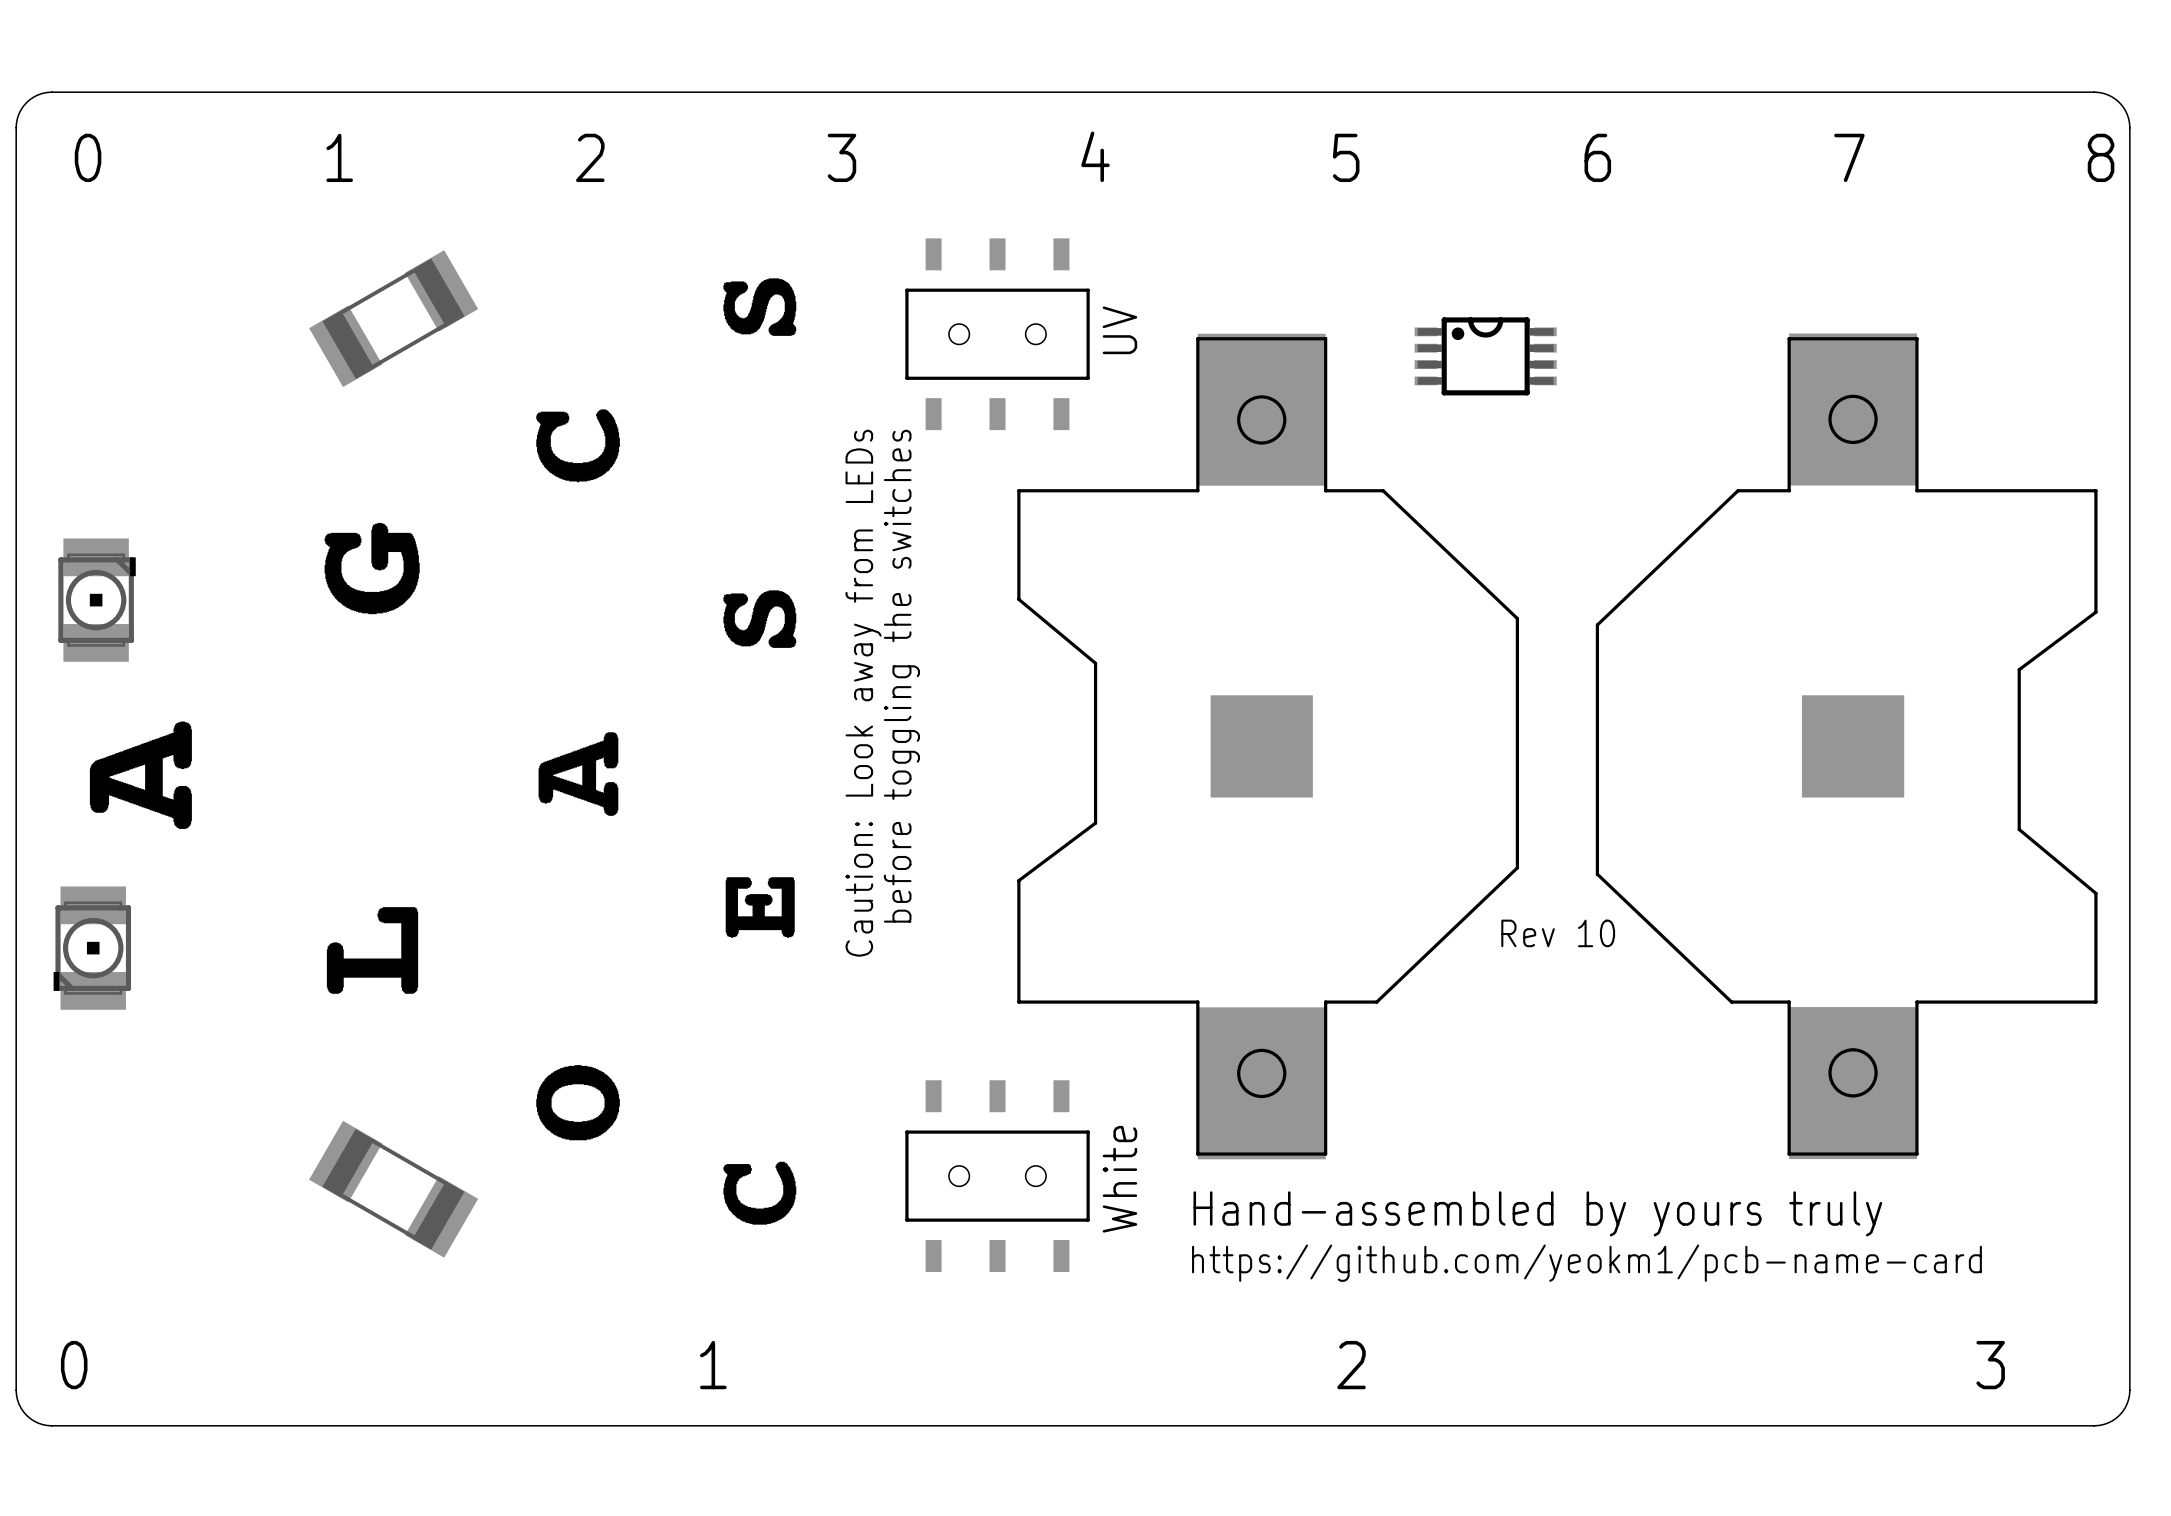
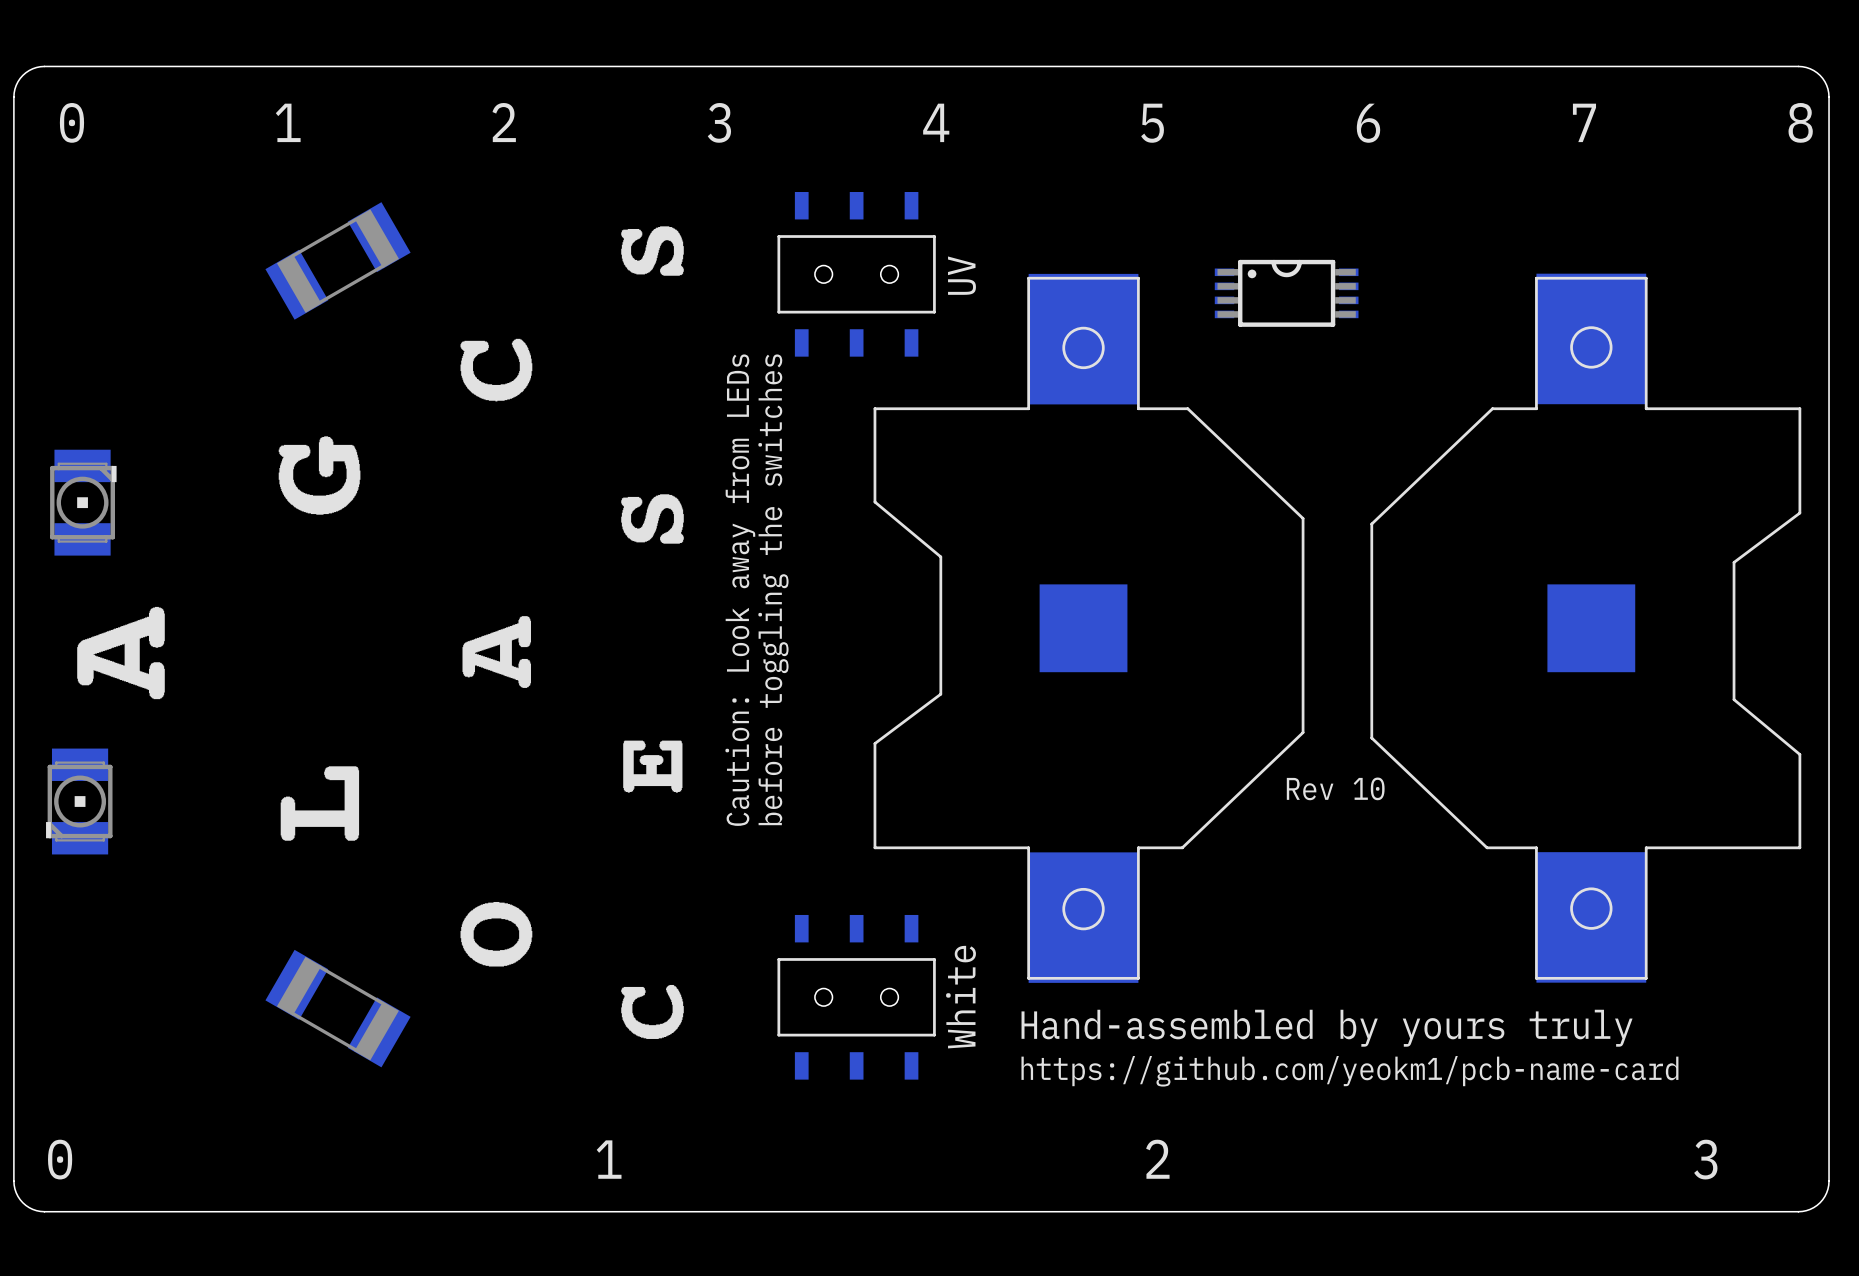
part footprint: [1414, 317, 1557, 396] -> [1214, 259, 1359, 327]

